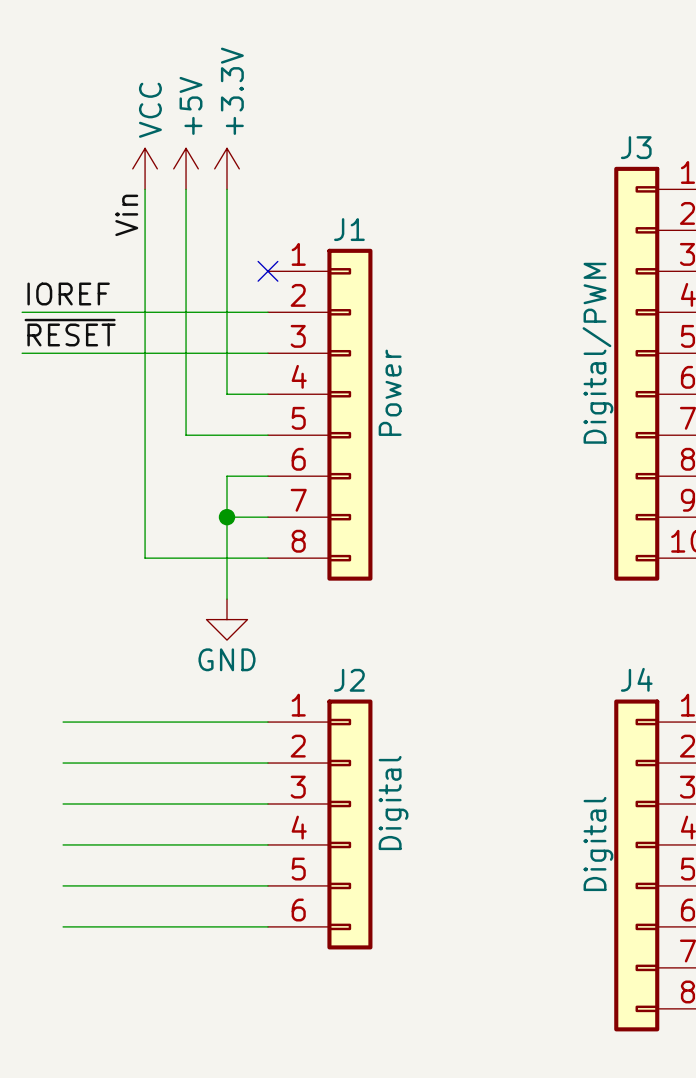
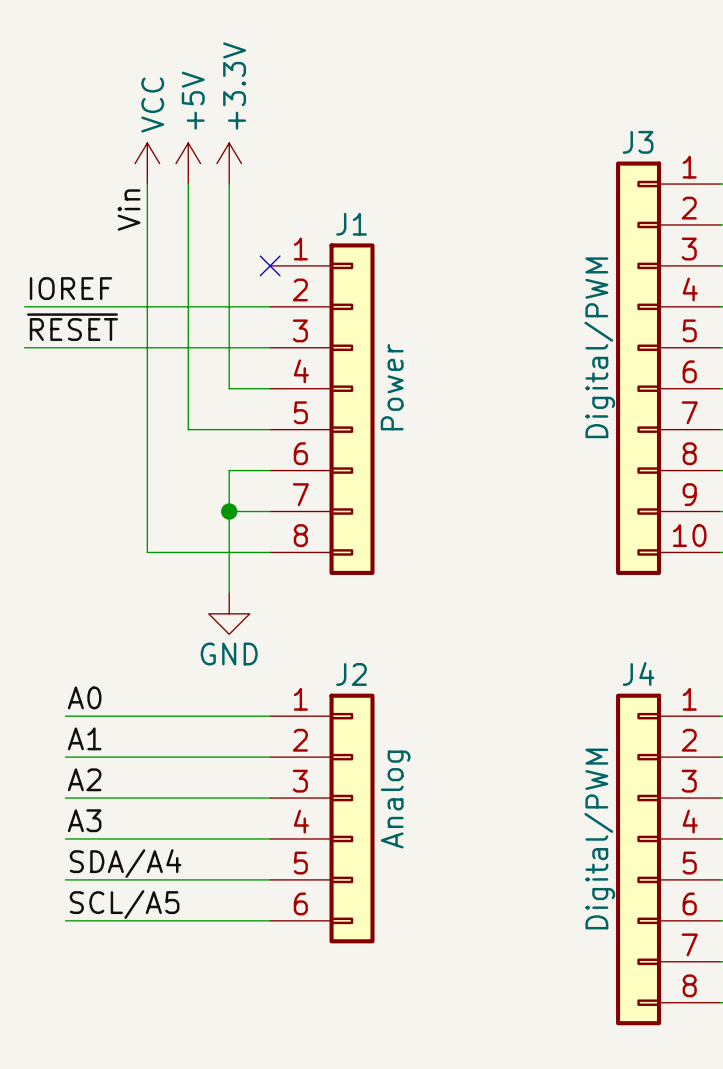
label: none -> A0 (84, 697)
label: none -> A1 (84, 738)
label: none -> A2 (84, 779)
J2 value: Digital (393, 803) -> Analog (395, 799)
label: none -> A3 (84, 820)
J4 value: Digital (598, 843) -> Digital/PWM (599, 838)
label: none -> SDA/A4 (125, 863)
label: none -> SCL/A5 (124, 904)

